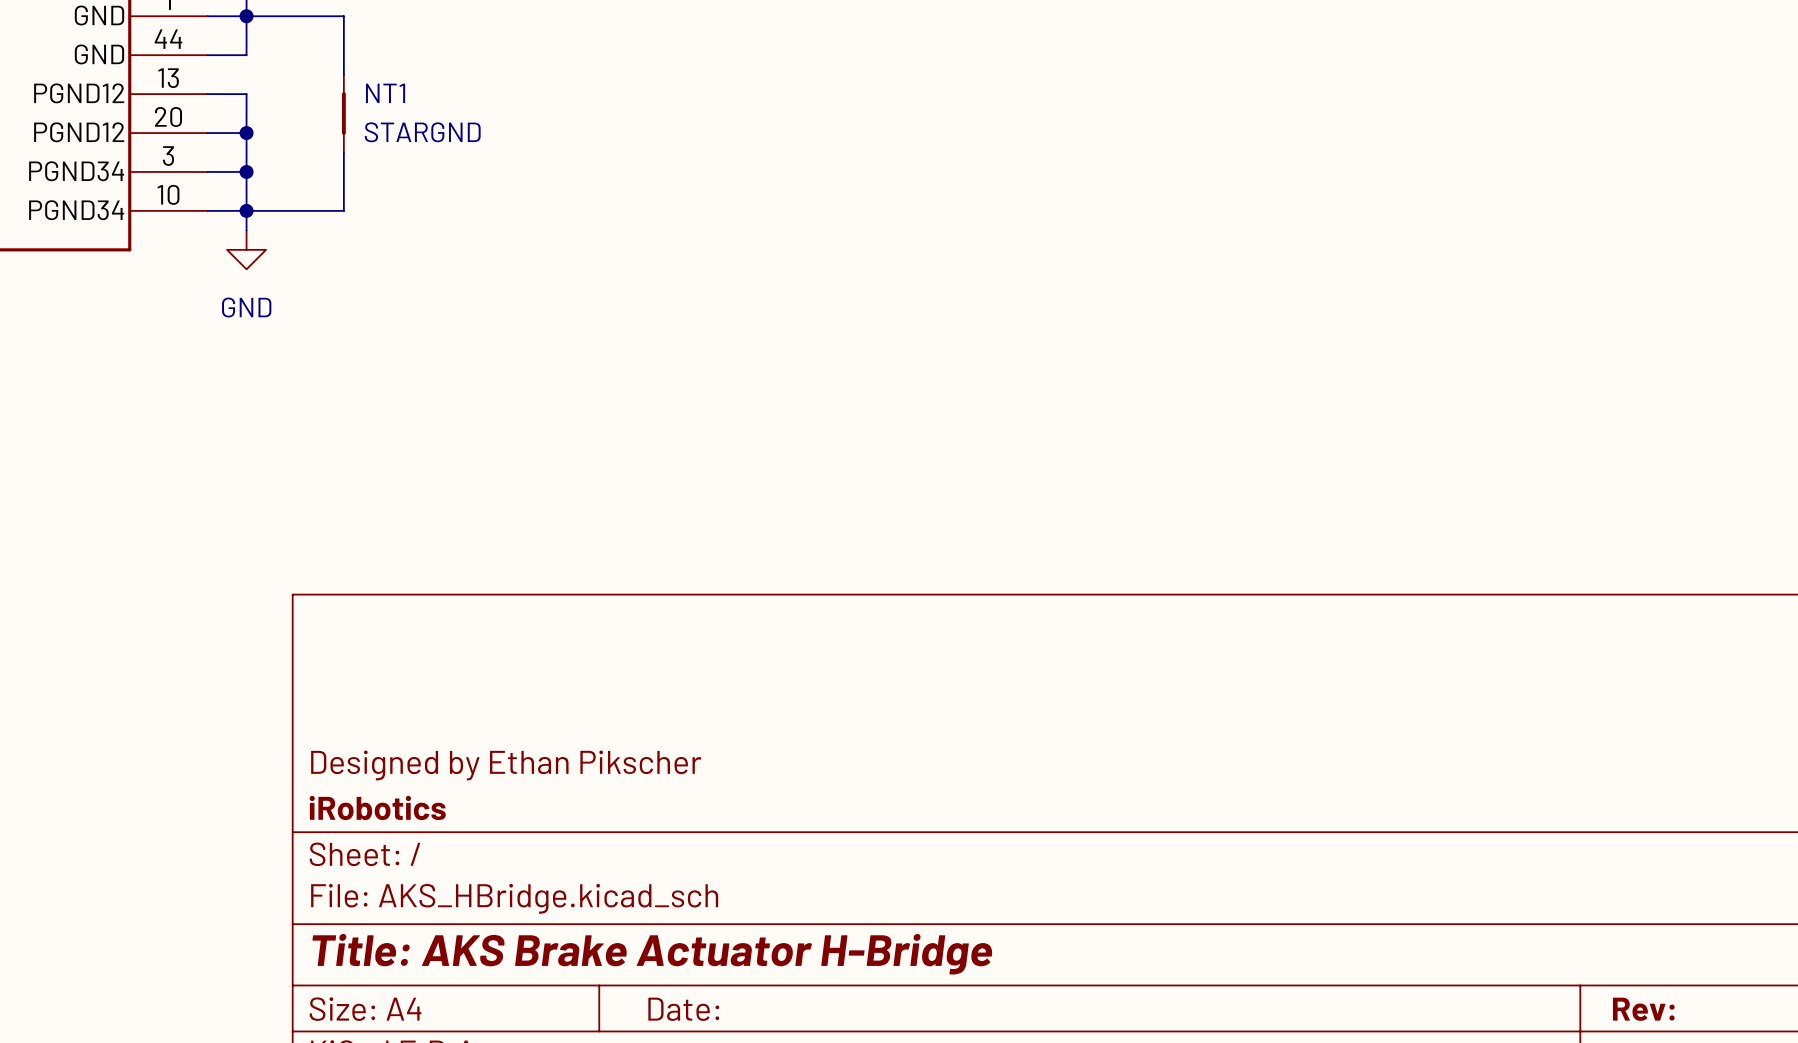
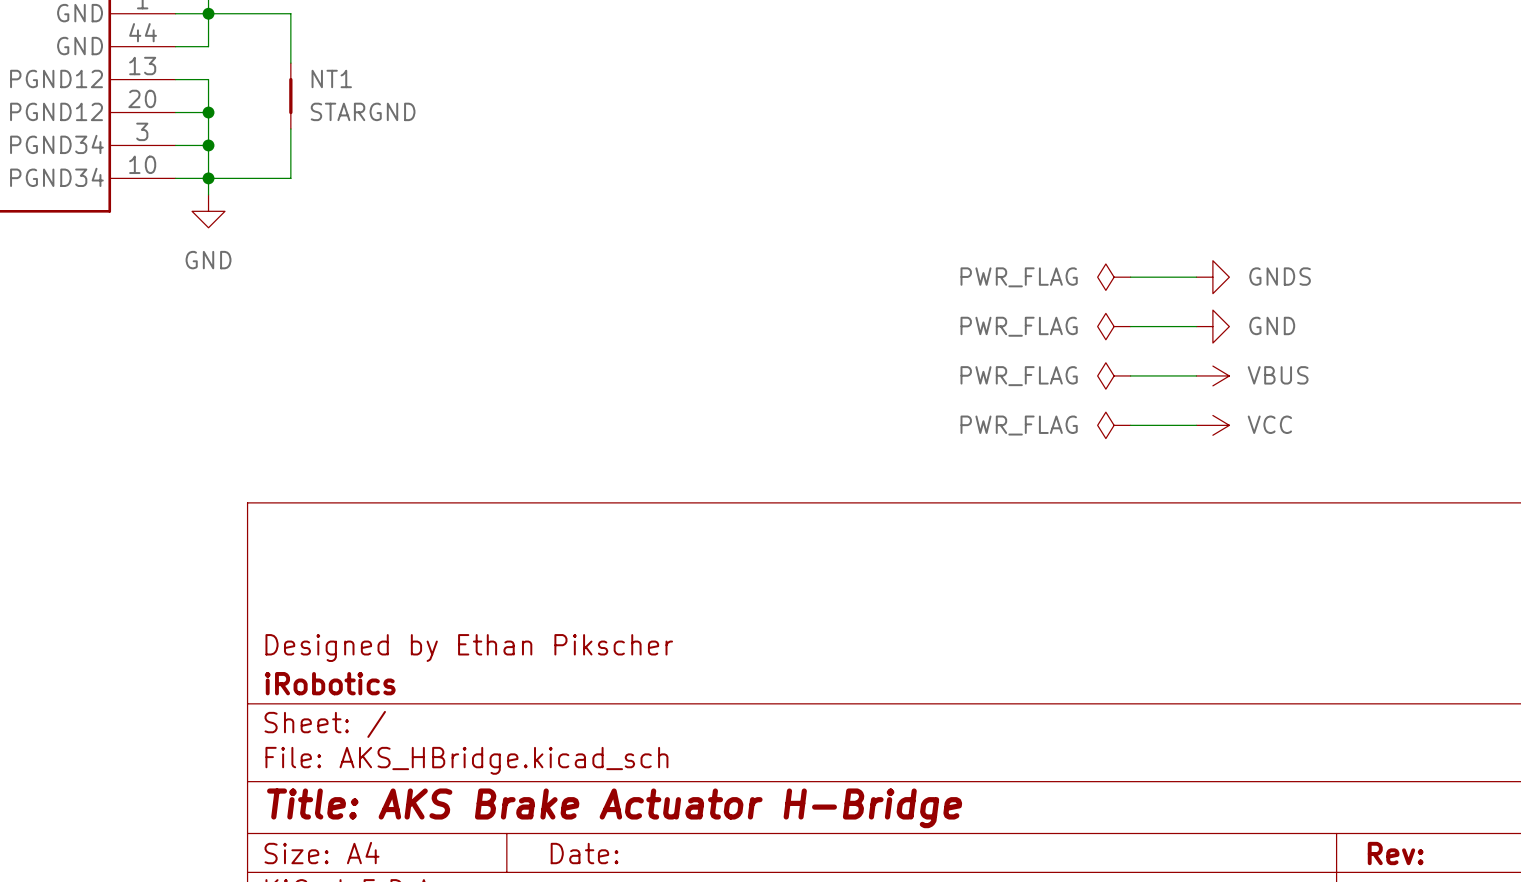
power symbol: none -> PWR_FLAG (1114, 277)
wire: none -> (1130, 277) (1196, 277)
power symbol: none -> GNDS (1212, 277)
power symbol: none -> PWR_FLAG (1114, 326)
wire: none -> (1130, 326) (1196, 326)
power symbol: none -> GND (1212, 326)
power symbol: none -> PWR_FLAG (1114, 375)
wire: none -> (1130, 375) (1196, 375)
power symbol: none -> VBUS (1212, 375)
power symbol: none -> PWR_FLAG (1114, 425)
wire: none -> (1130, 425) (1196, 425)
power symbol: none -> VCC (1212, 425)

